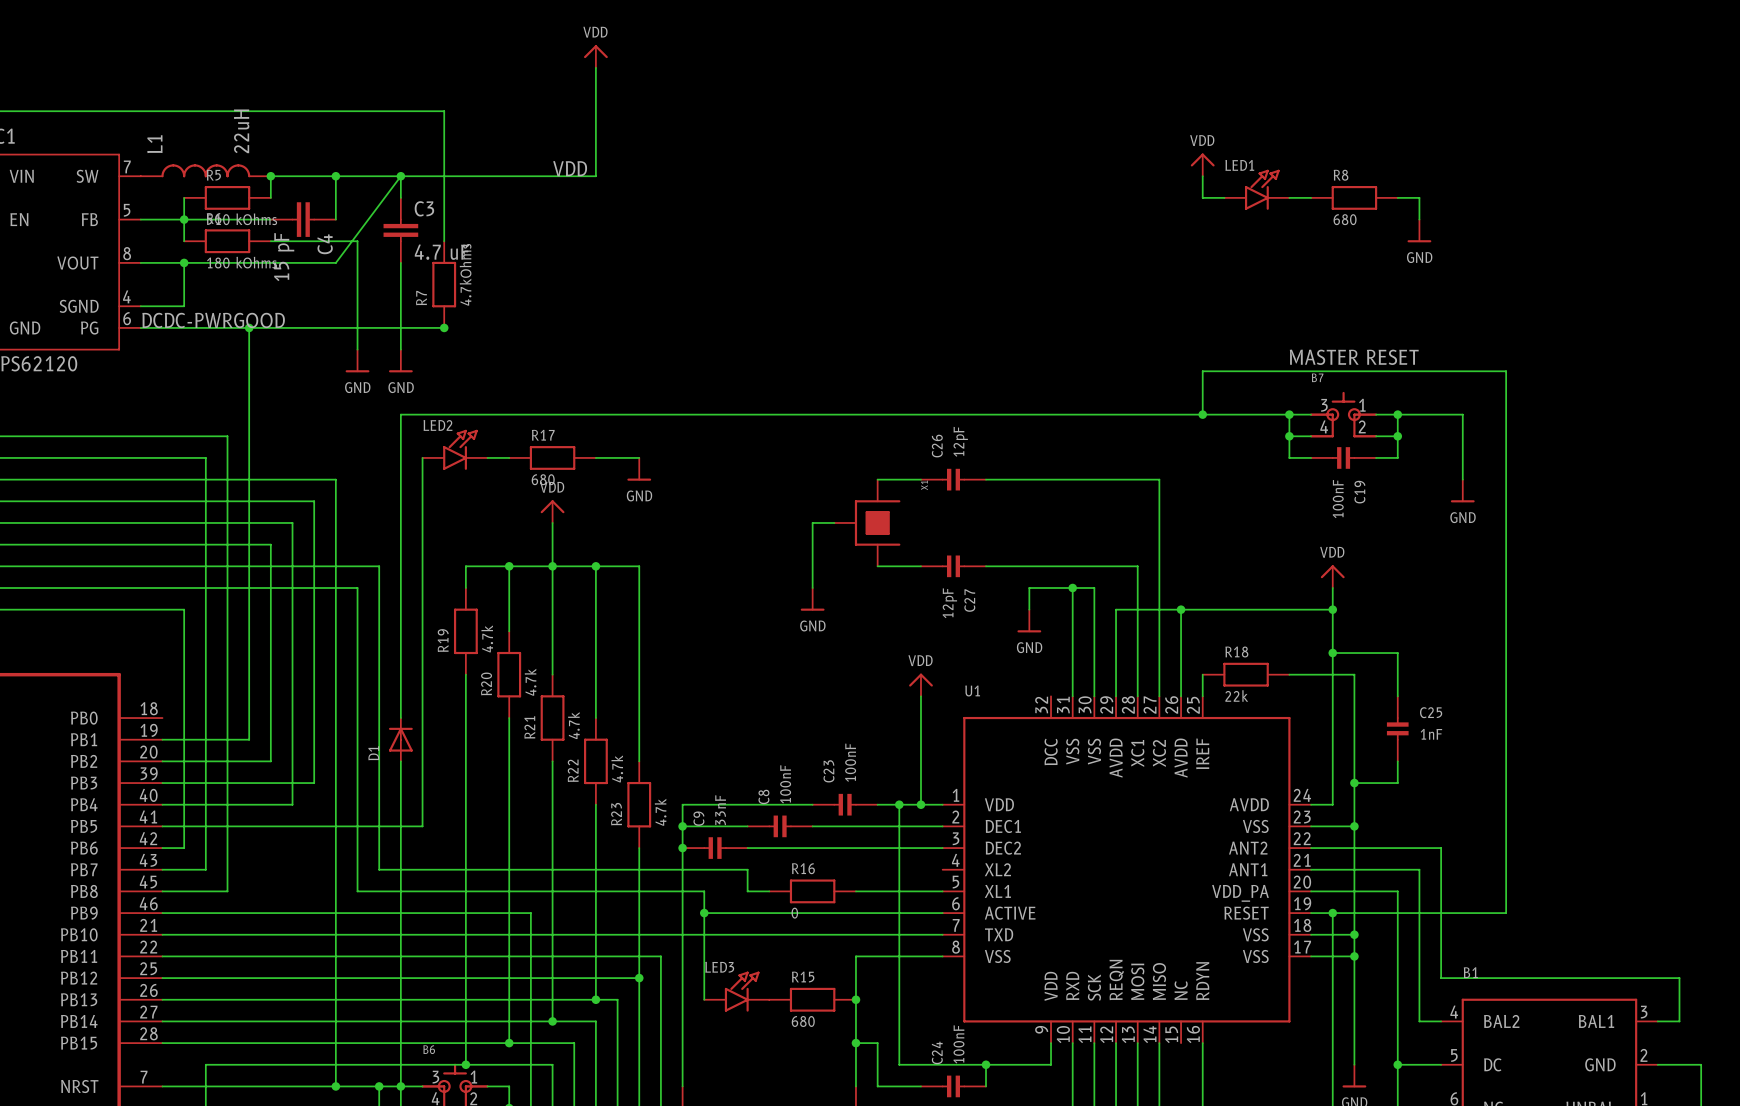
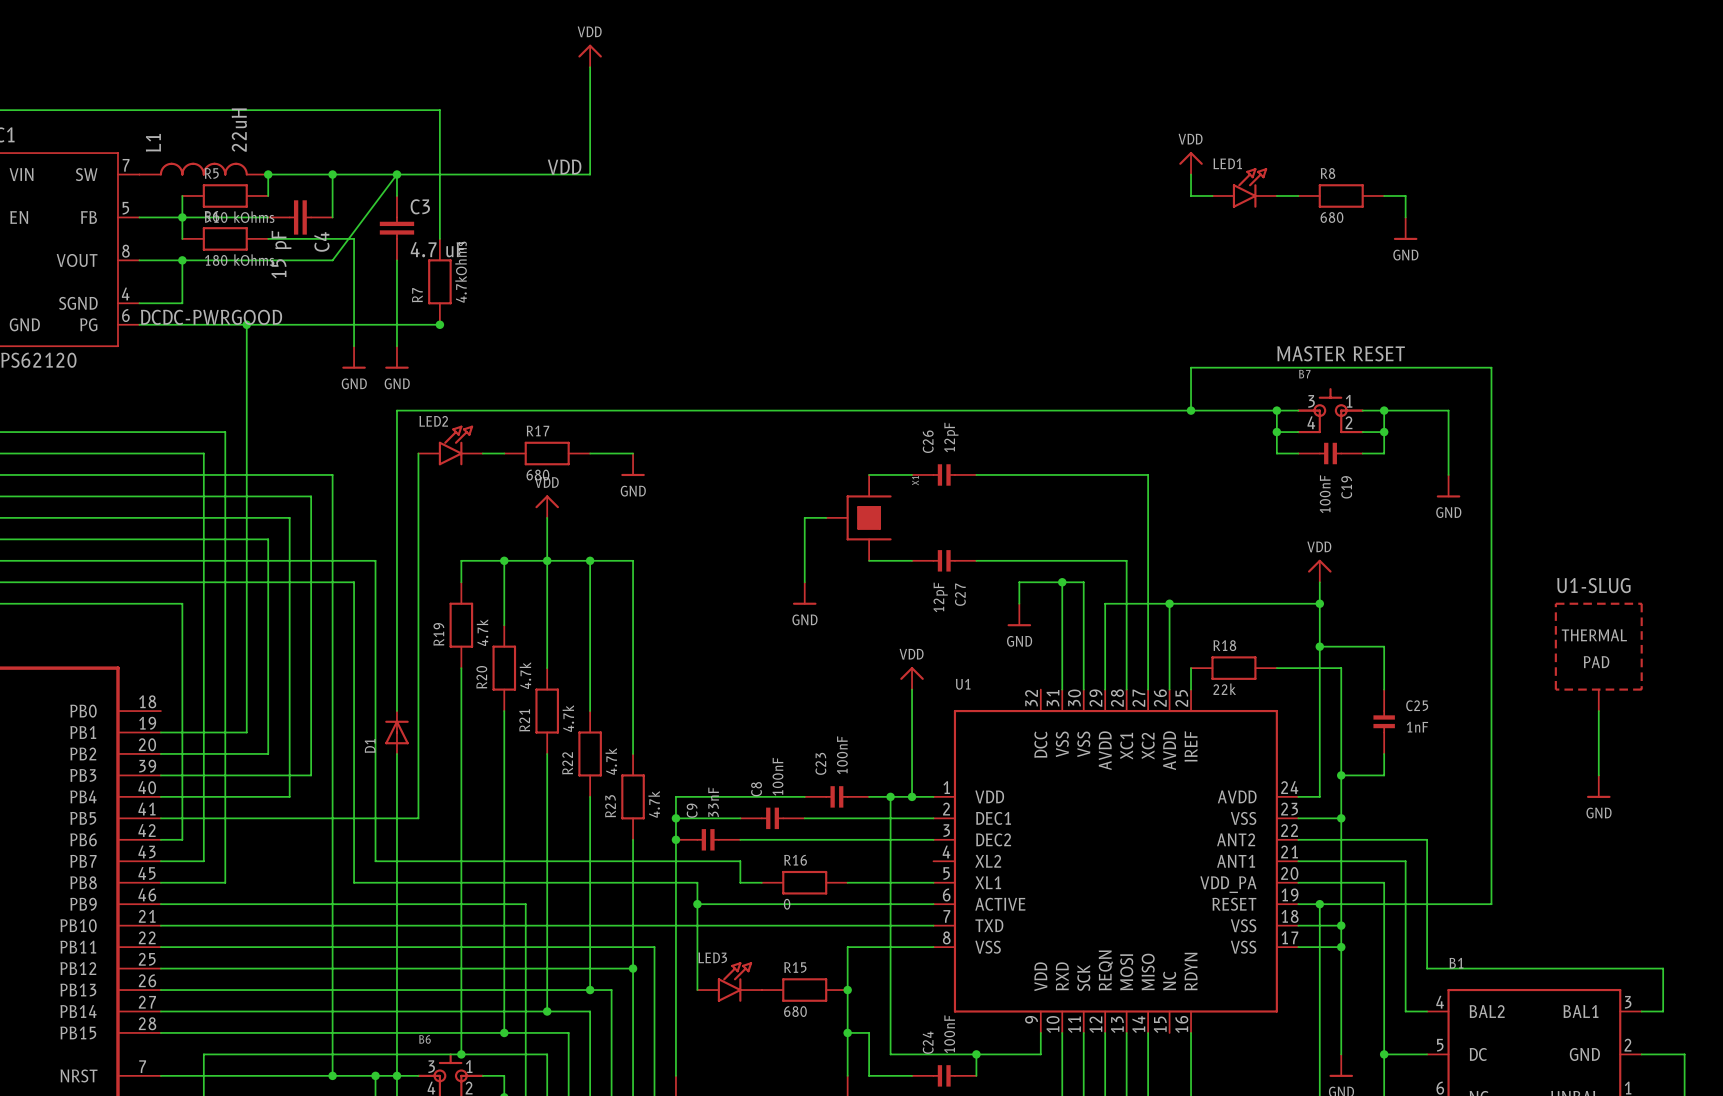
U1-SLUG: none -> (1598, 656)
wire: none -> (1598, 711) (1598, 775)
power symbol: none -> GND (1598, 786)

